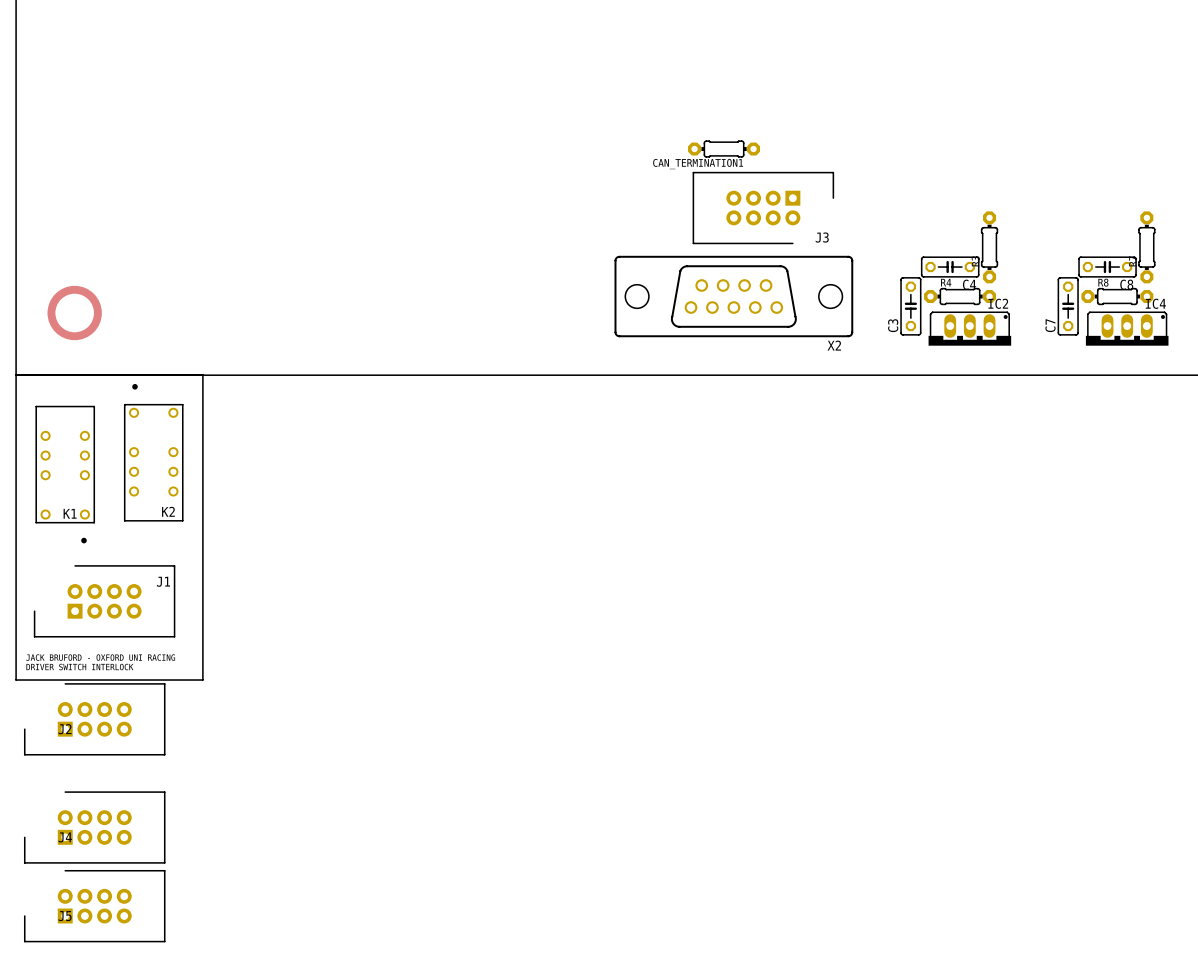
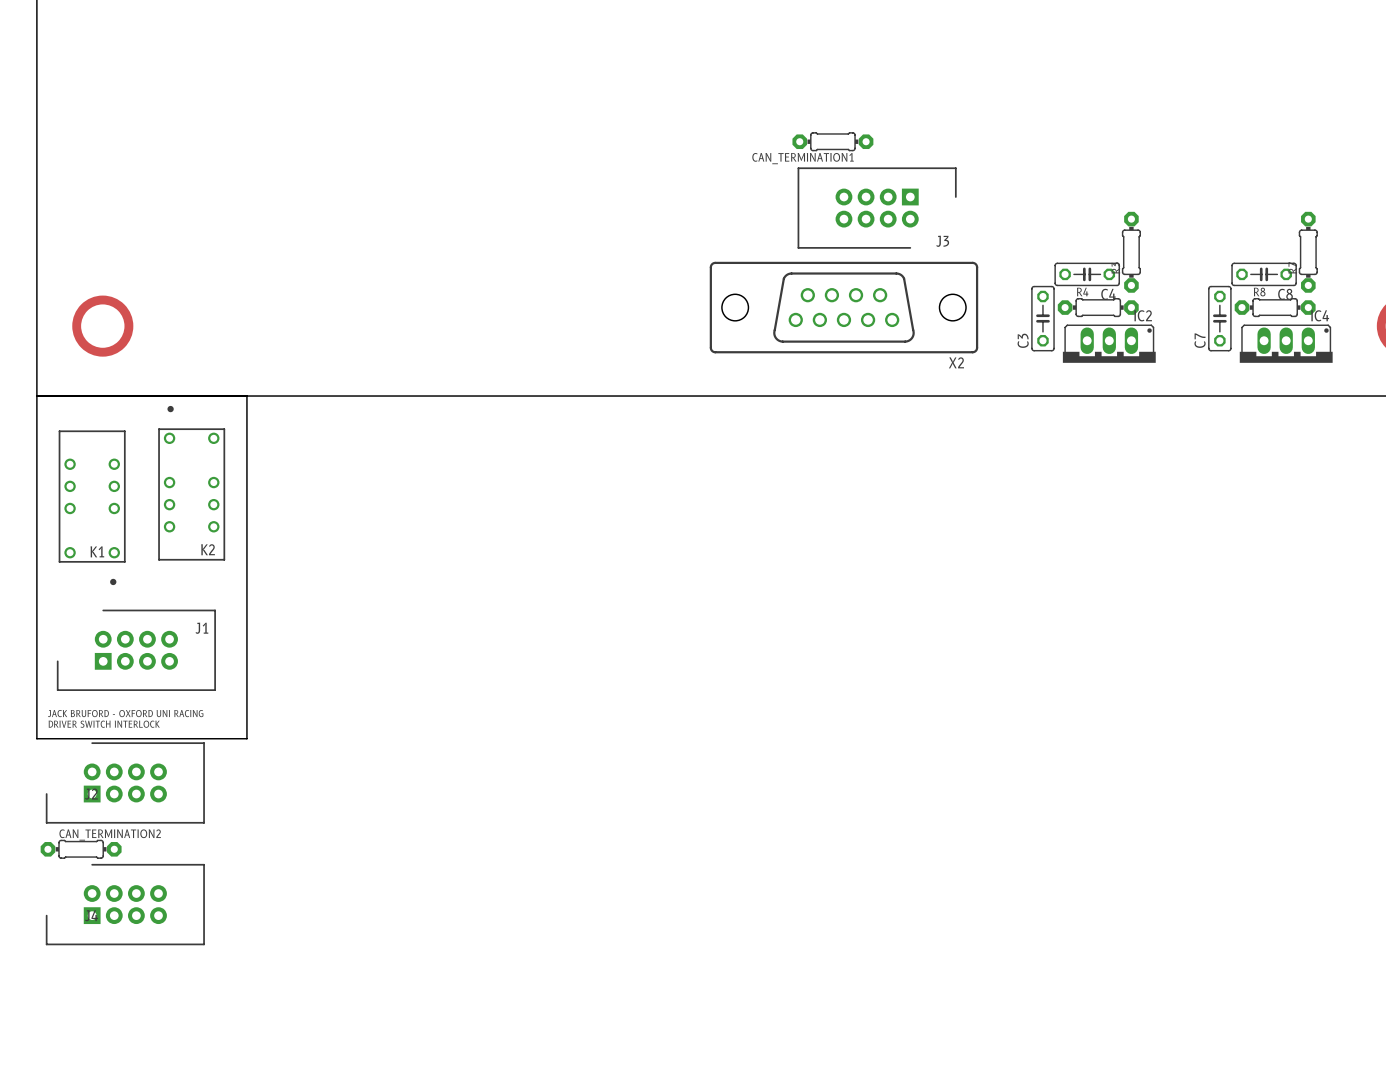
CAN_TERMINATION2: none -> (81, 849)
J5: (94, 906) -> none

